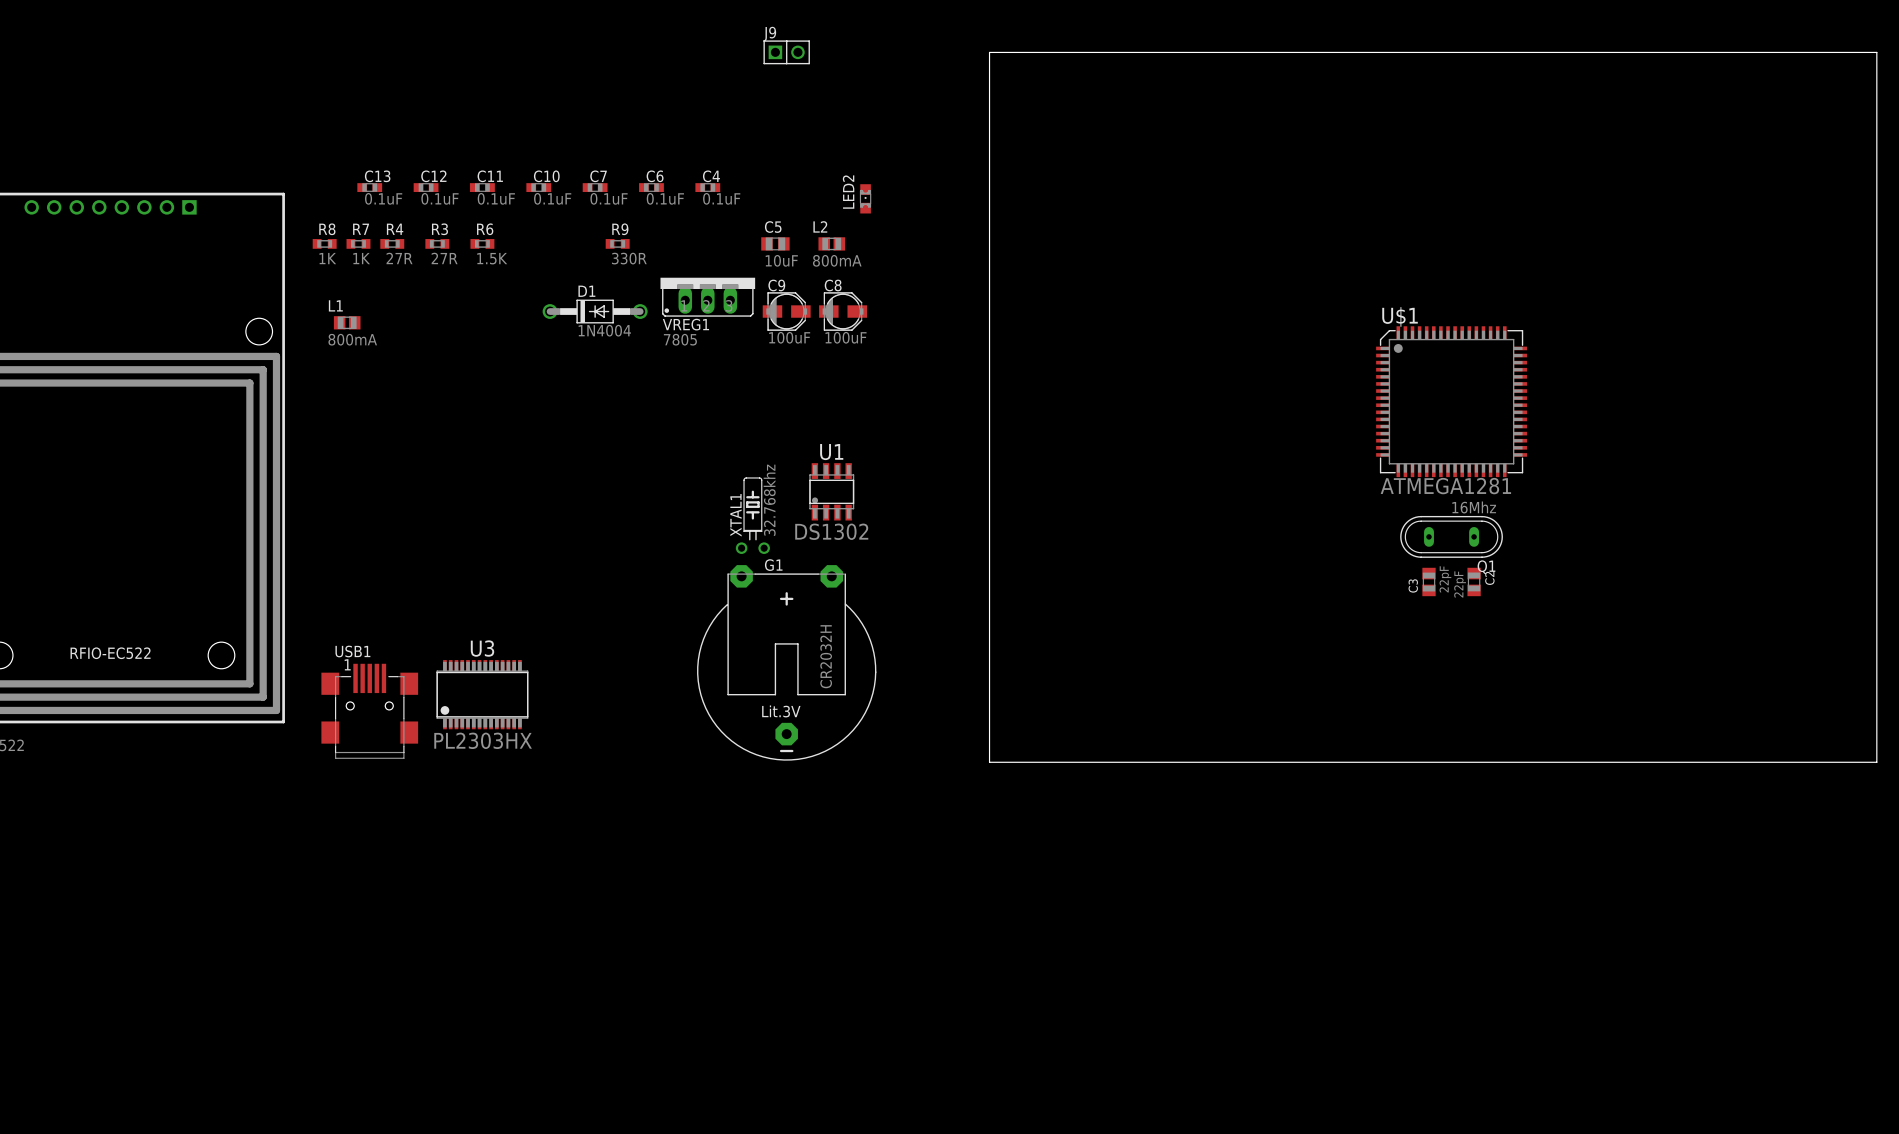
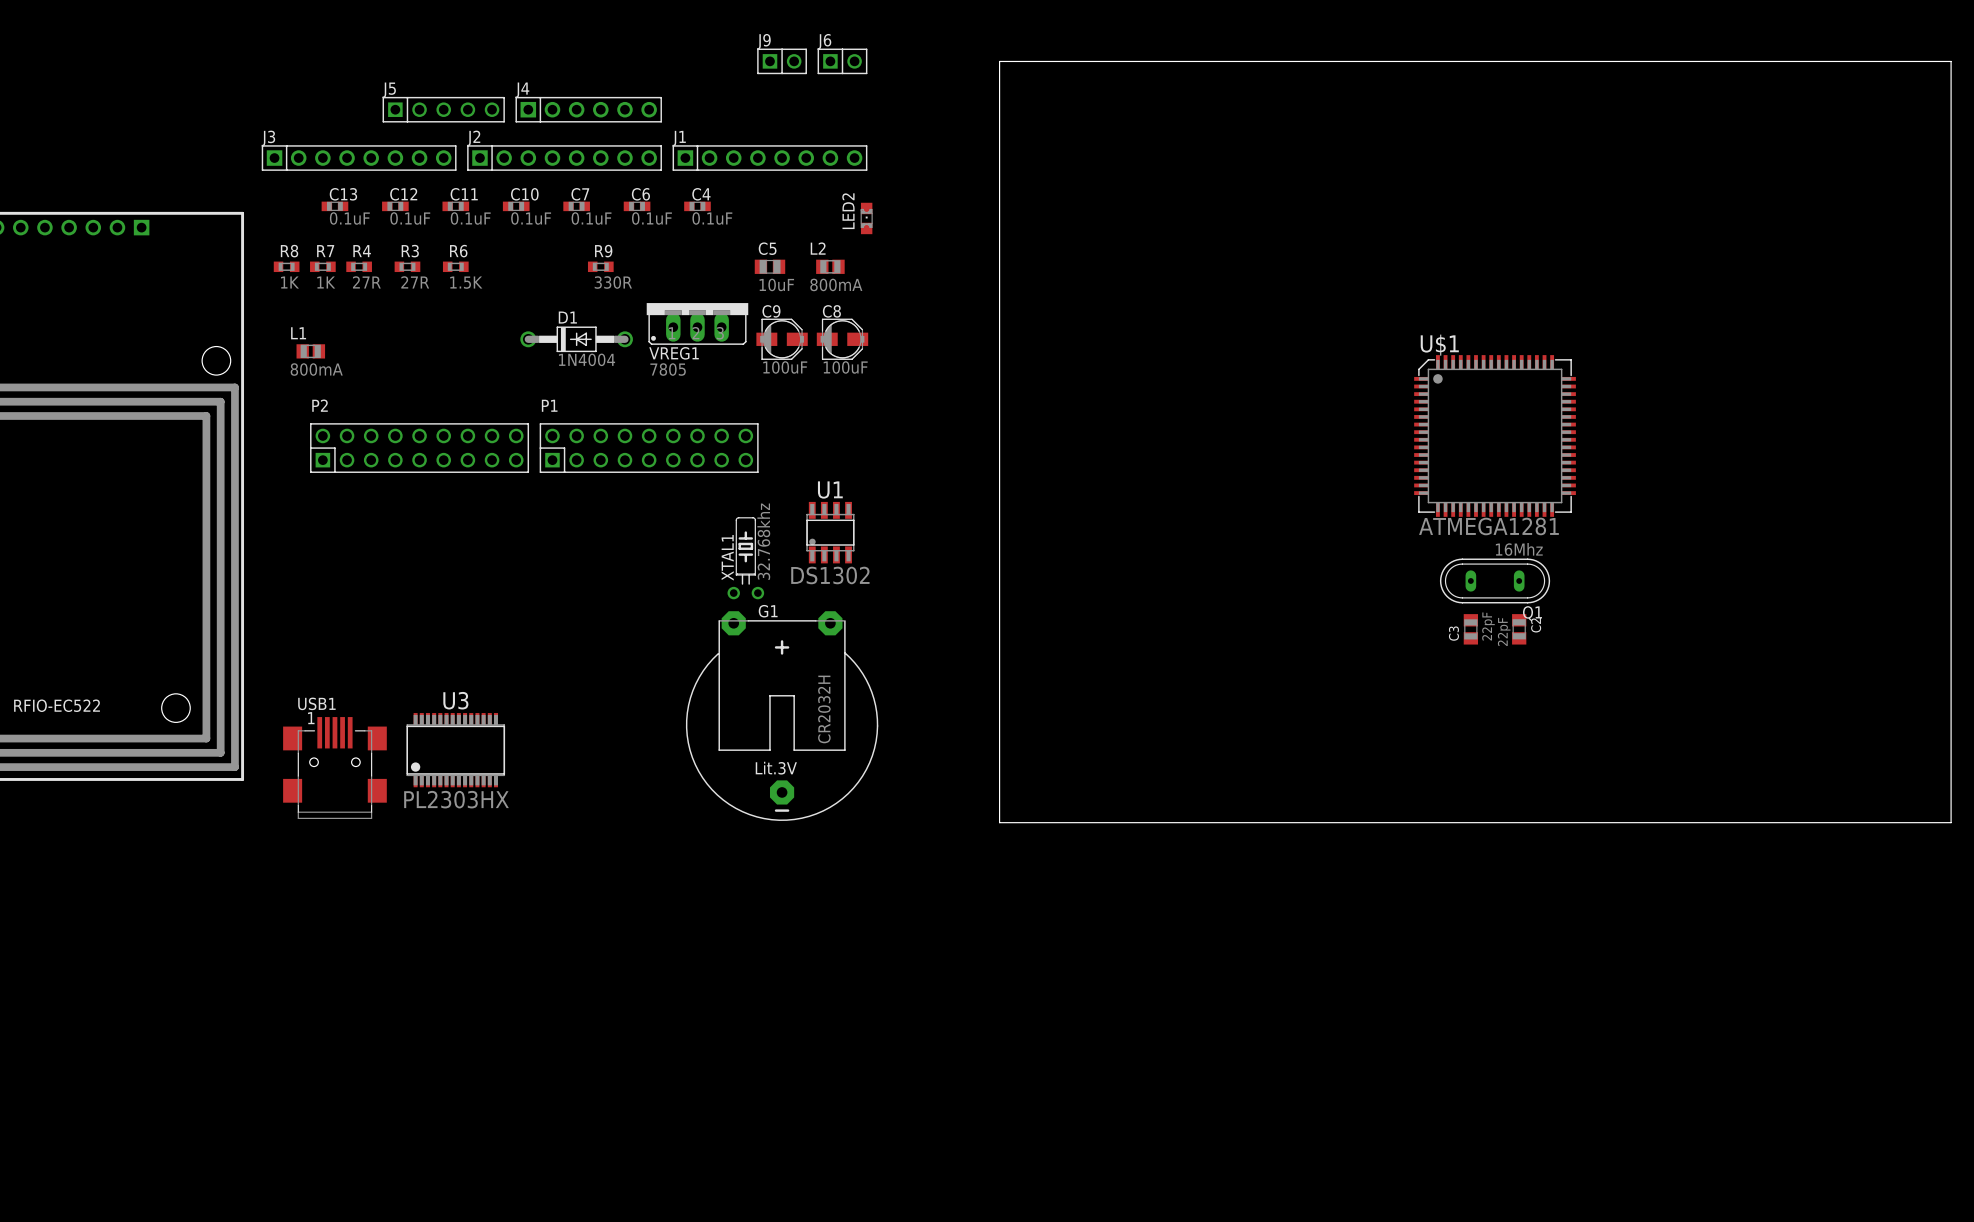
J6: none -> (842, 61)
J5: none -> (443, 109)
J4: none -> (588, 109)
J3: none -> (359, 158)
J2: none -> (564, 158)
J1: none -> (769, 158)
P2: none -> (419, 448)
P1: none -> (649, 448)

